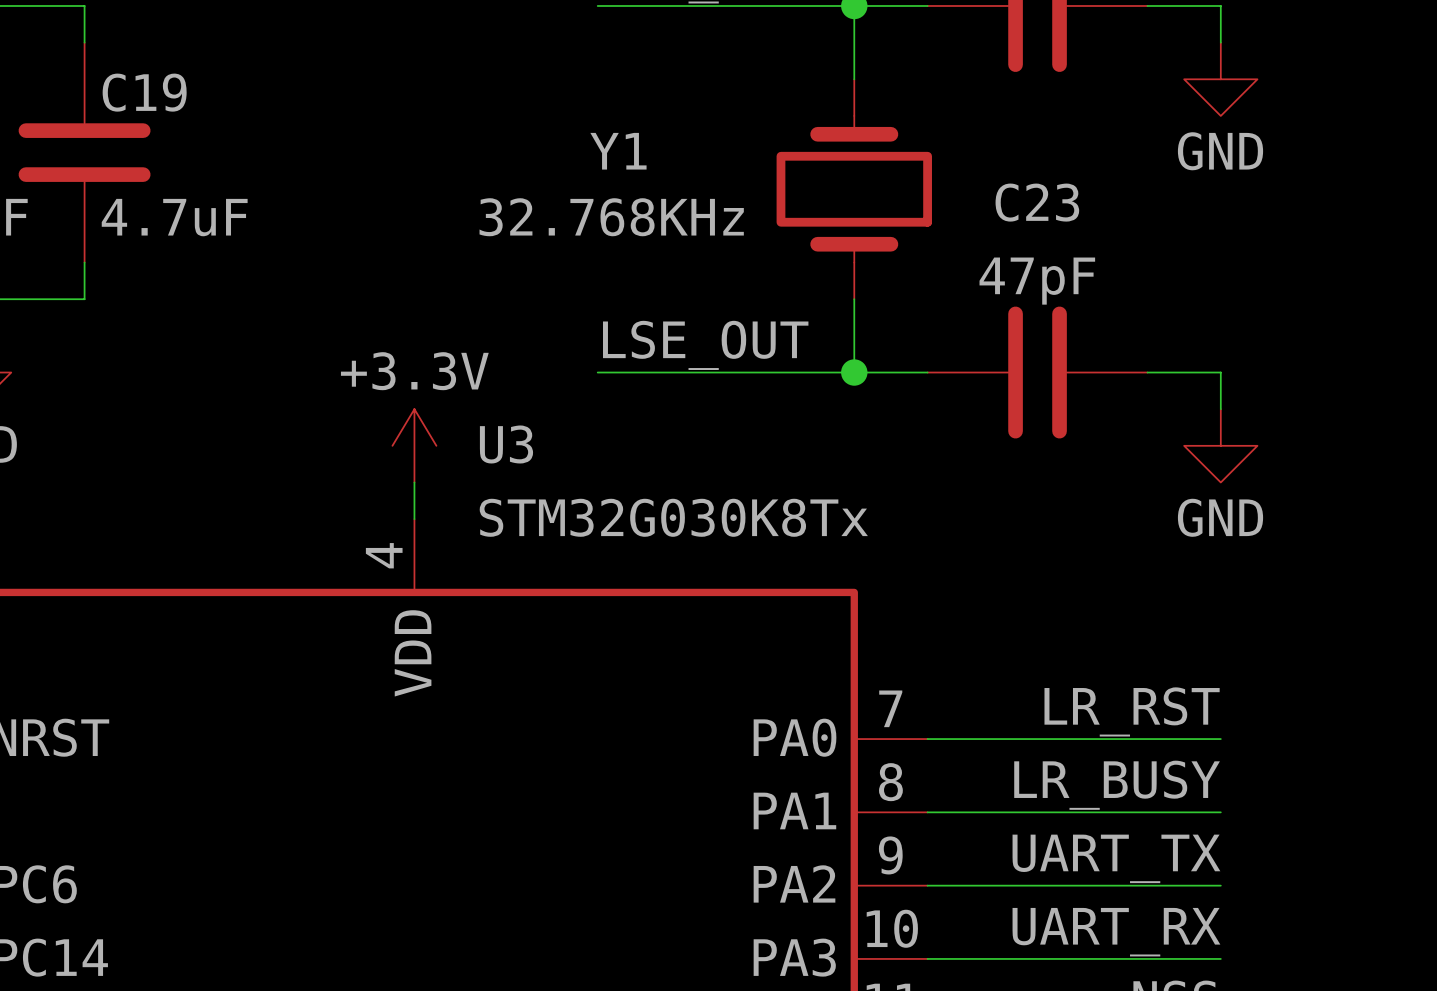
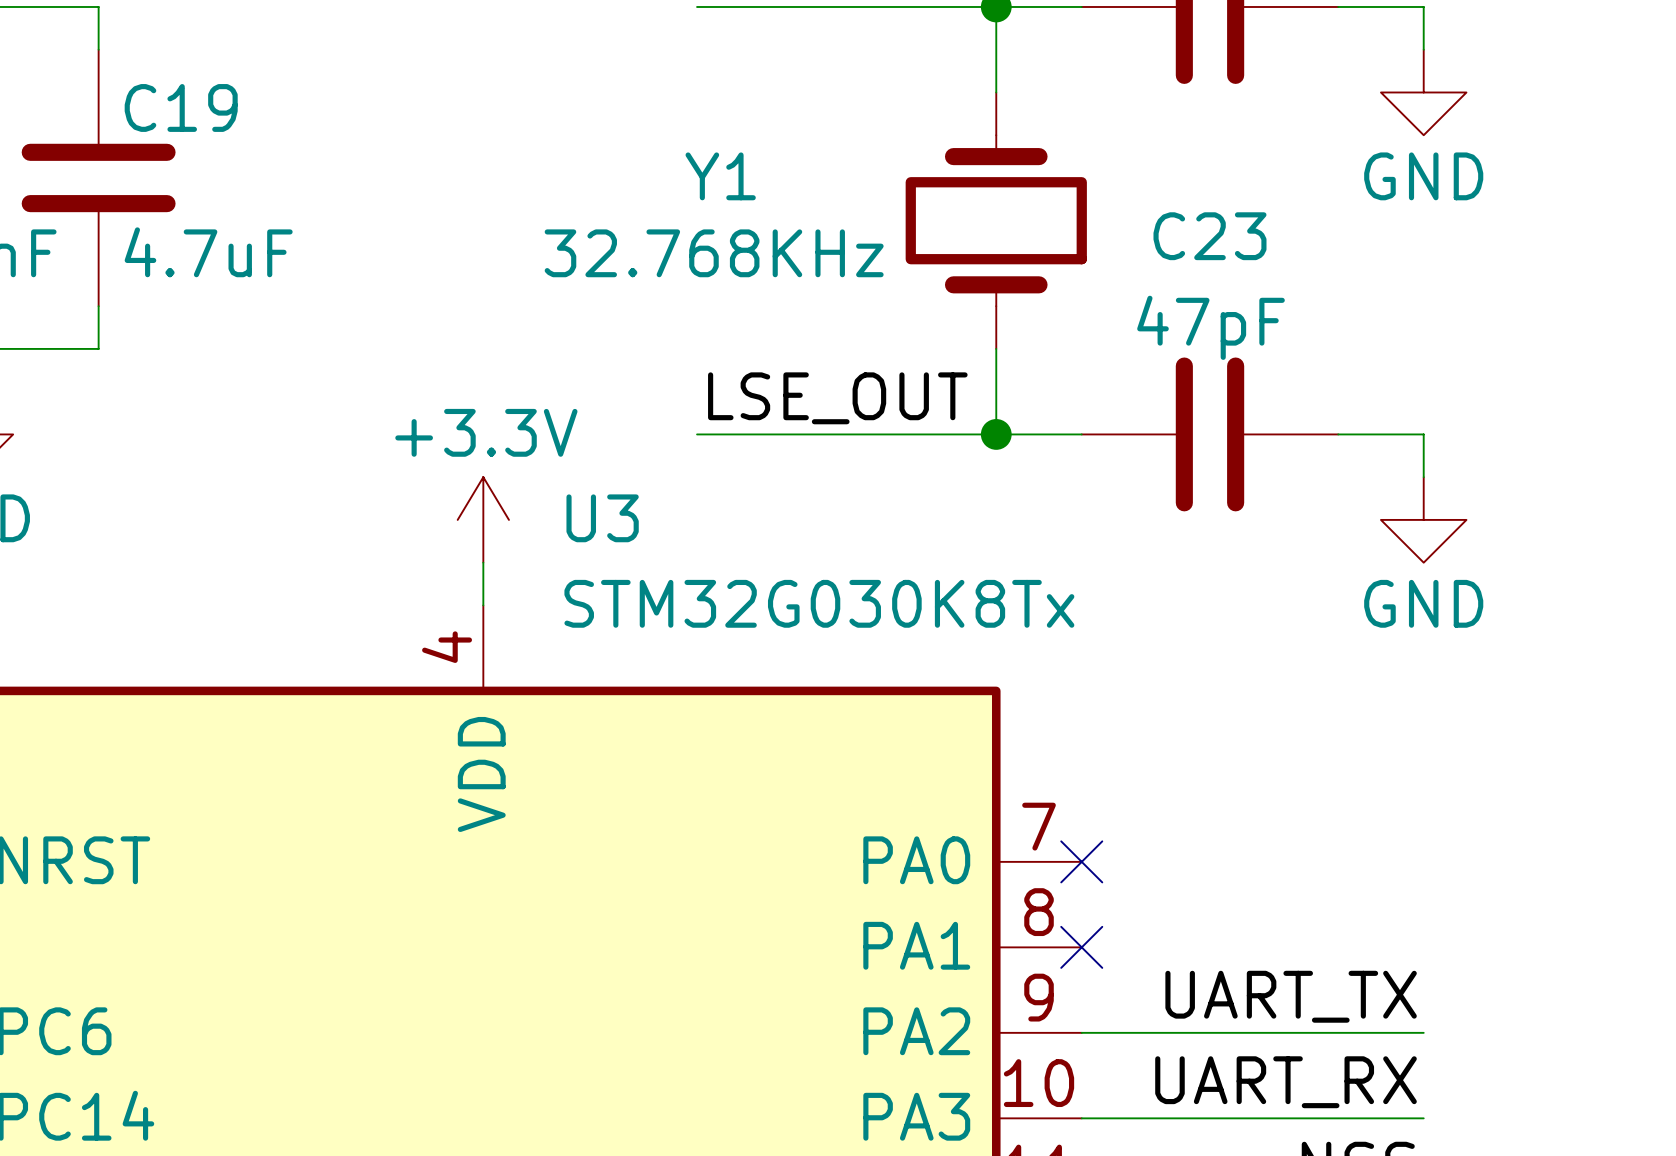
label: LR_RST (1132, 711) -> none
wire: (927, 739) (1220, 739) -> none
no-connect mark: none -> (1081, 861)
label: LR_BUSY (1117, 785) -> none
wire: (927, 812) (1220, 812) -> none
no-connect mark: none -> (1081, 947)

